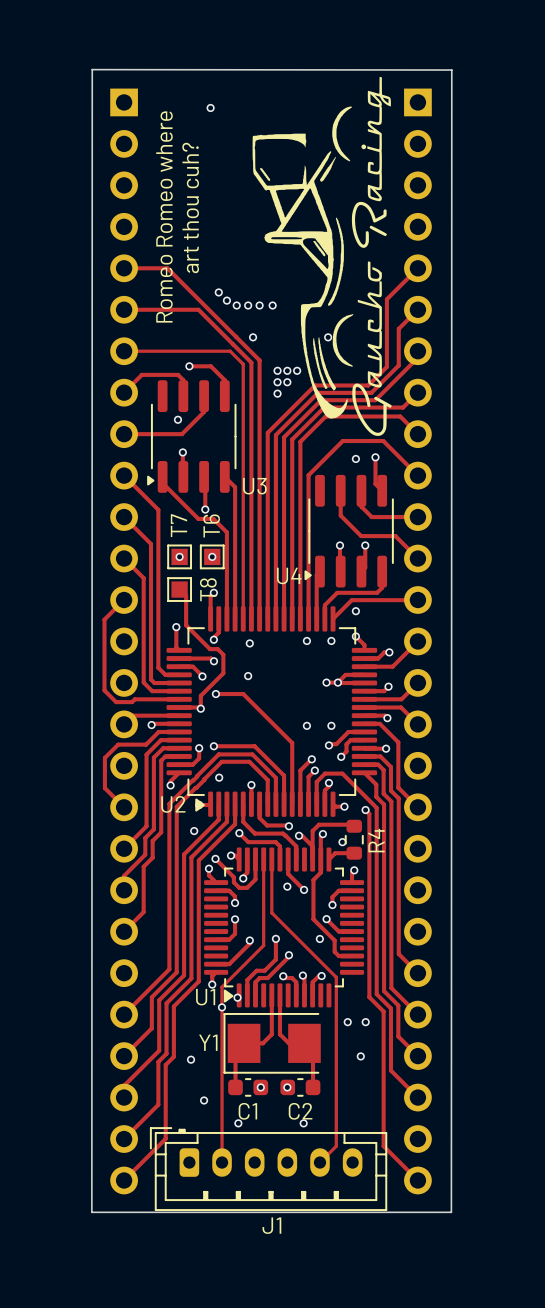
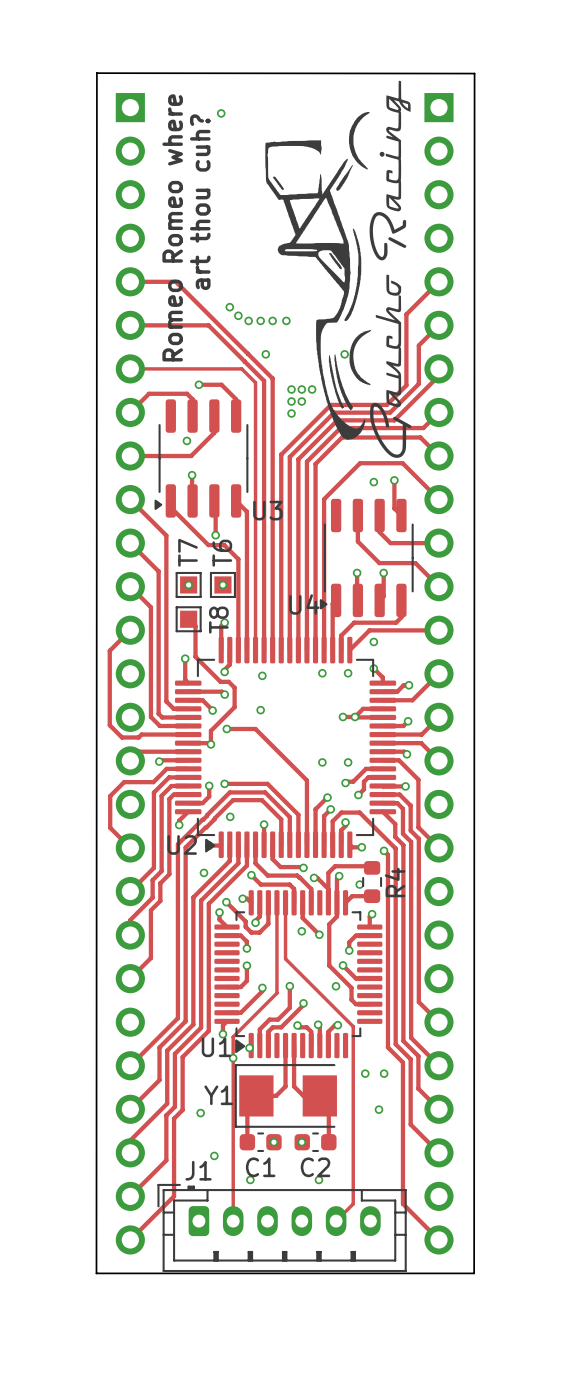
J1 name position: J1 (271, 1225) -> J1 (198, 1170)

